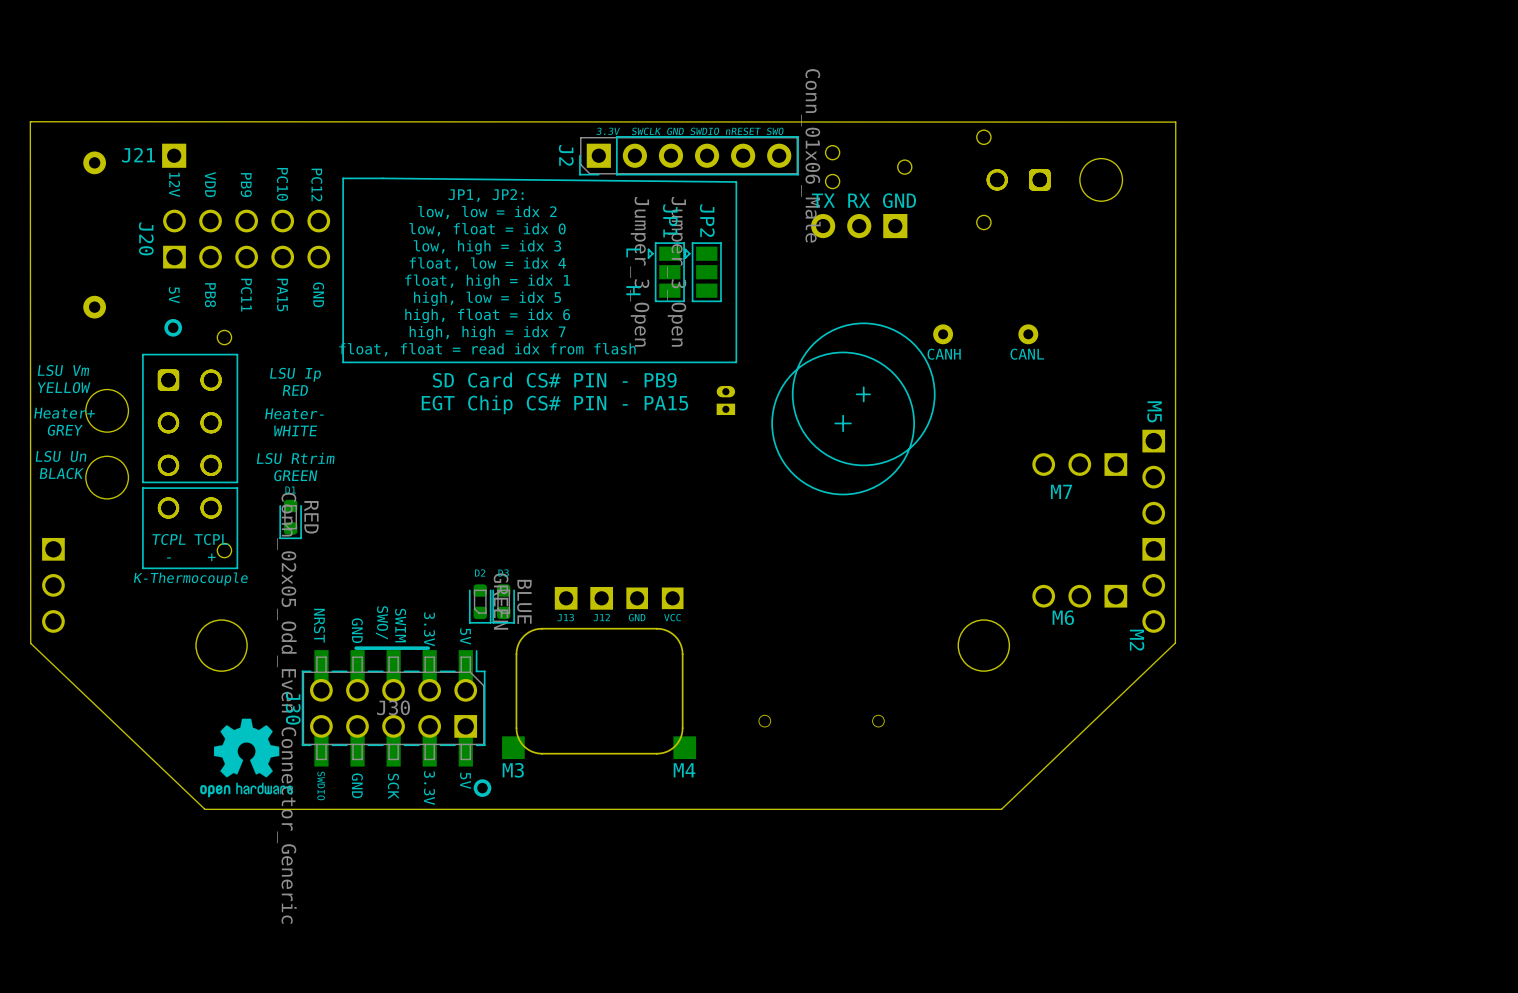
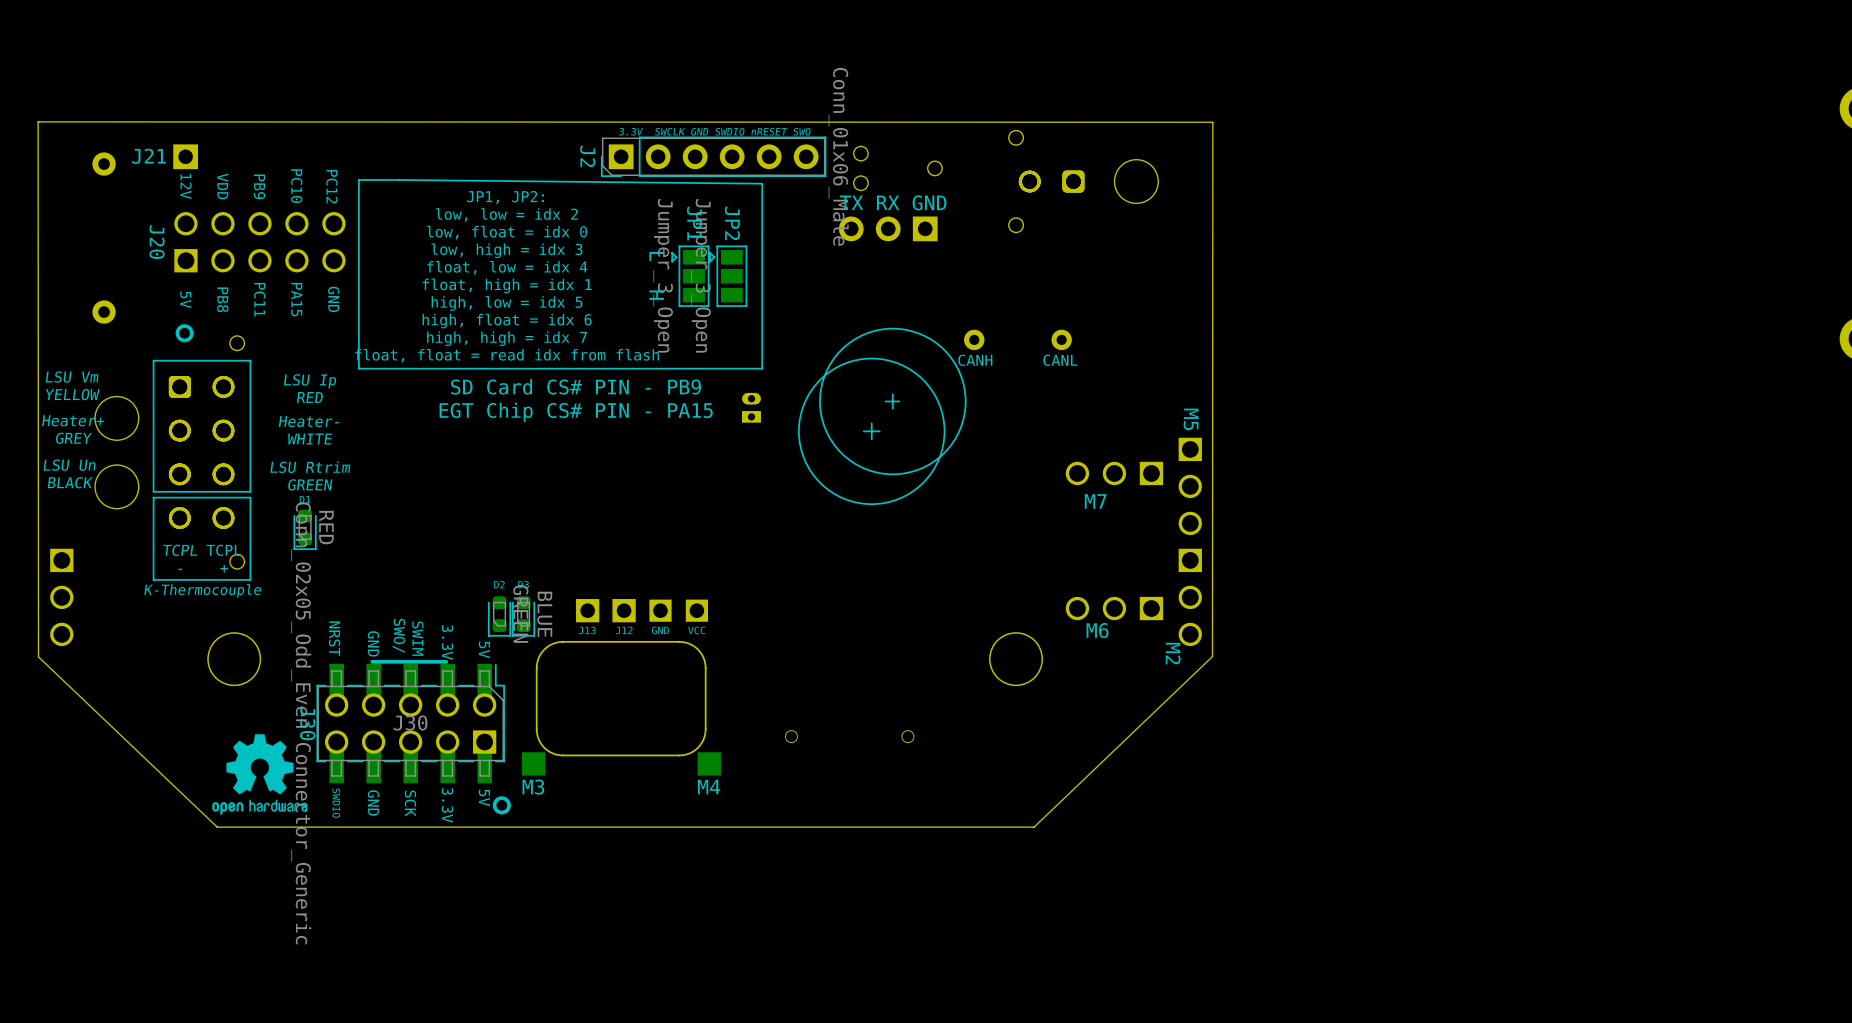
board edge: (655, 628) (663, 629) (672, 633) (679, 641) (682, 650) (682, 731) (679, 740) (669, 750) (657, 753) (535, 752) (526, 748) (518, 737) (516, 713) -> (679, 641) (695, 647) (702, 654) (705, 664) (705, 732) (702, 742) (692, 751) (679, 755) (559, 755) (549, 751) (542, 745) (536, 729)

